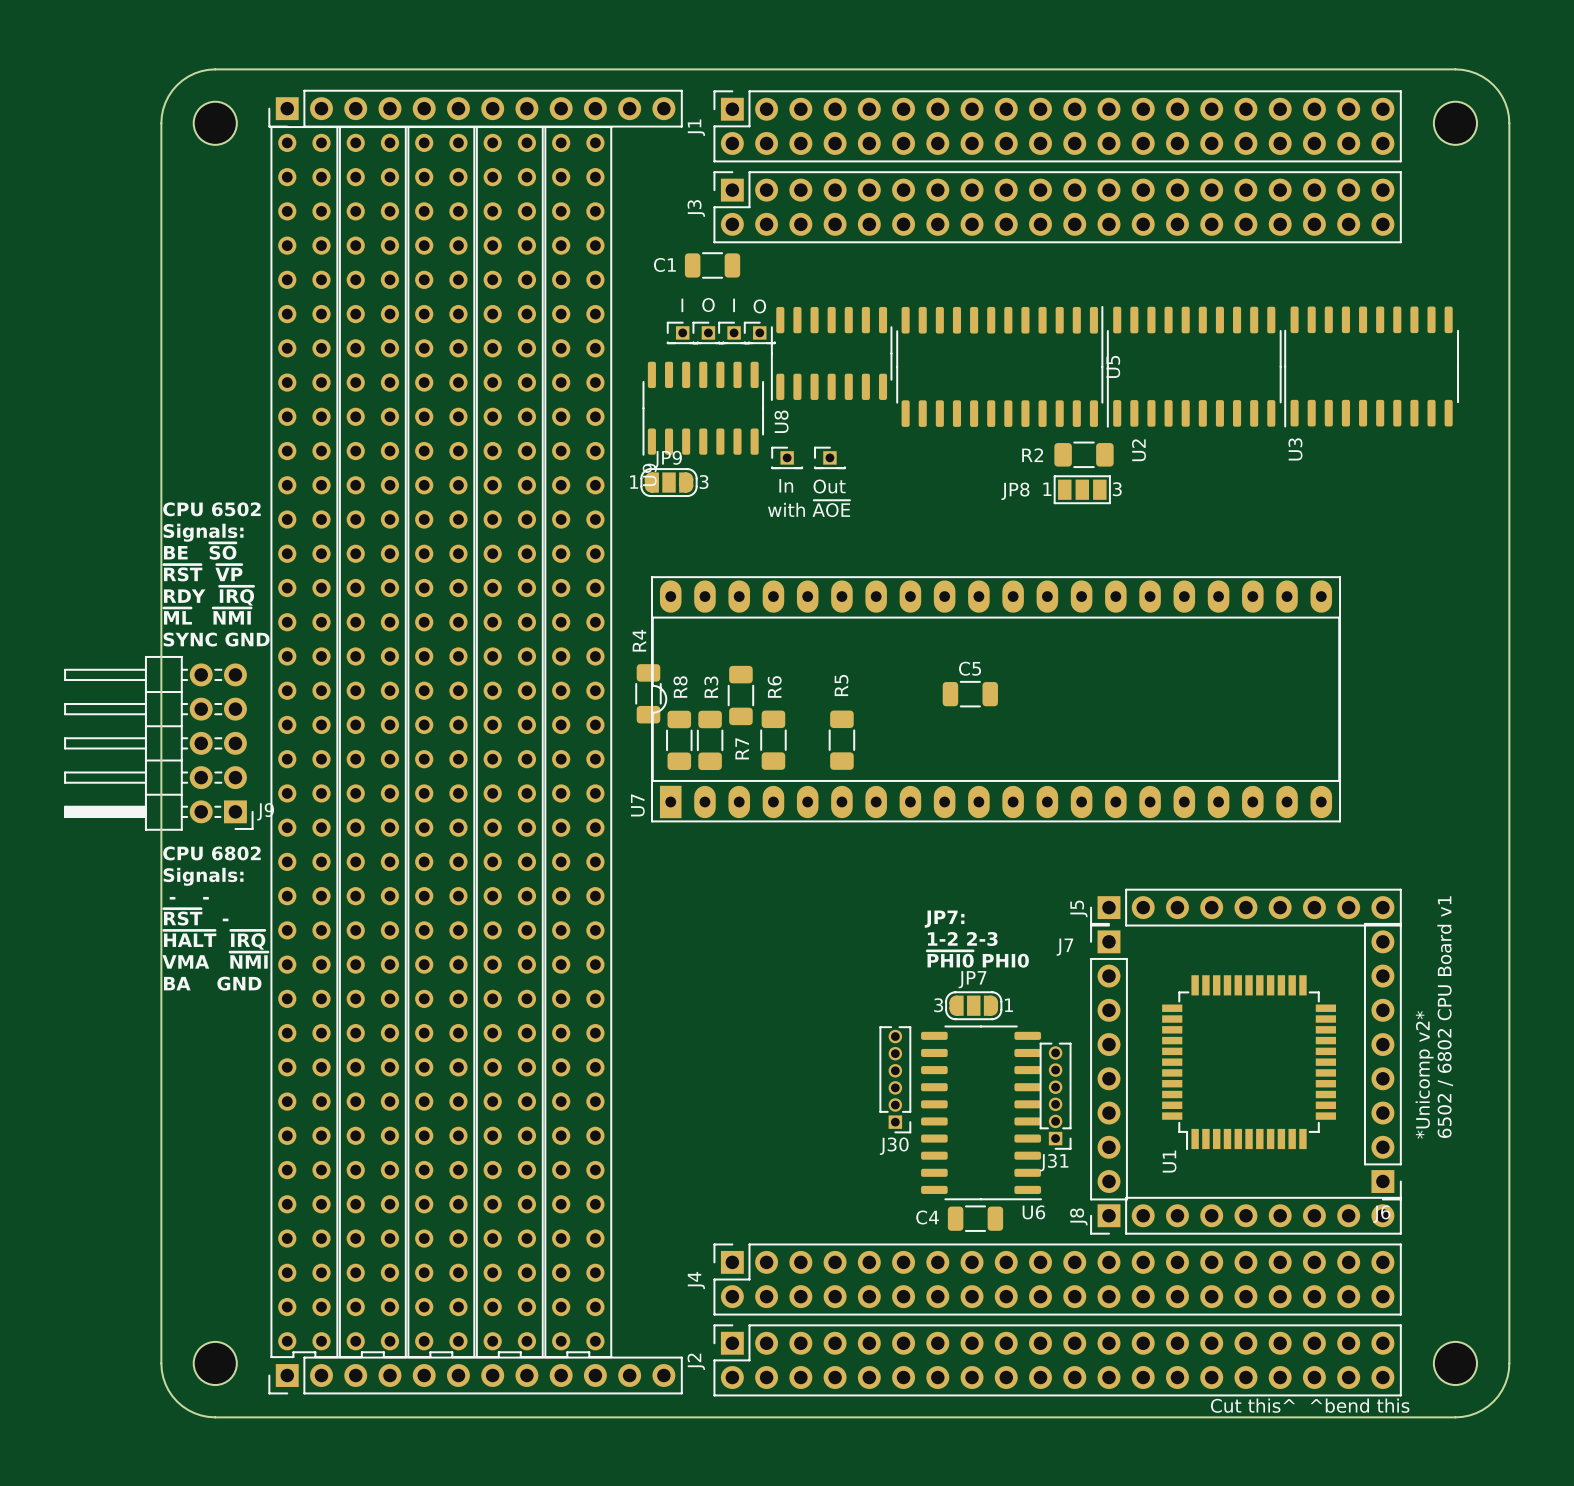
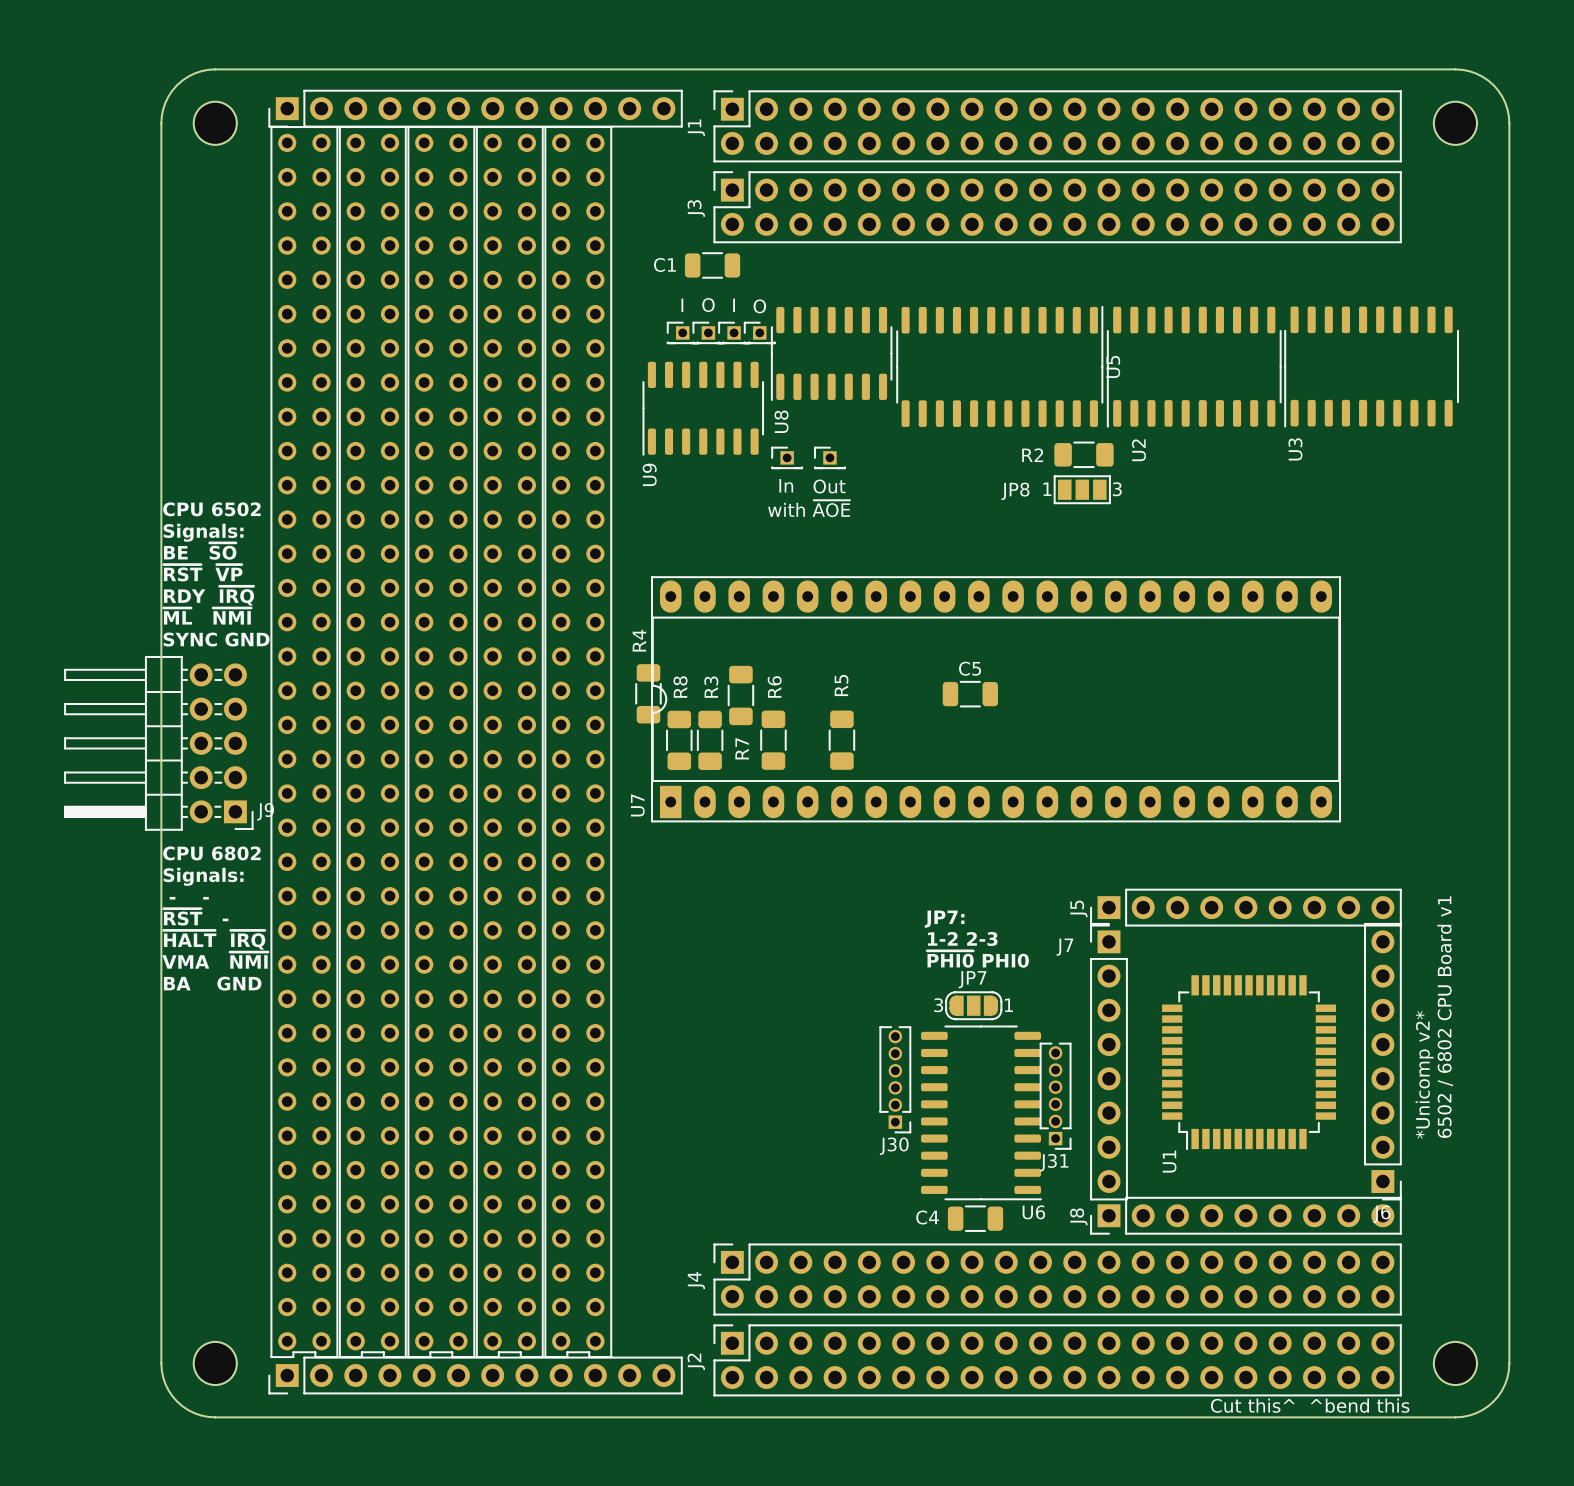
JP9: (669, 482) -> none

